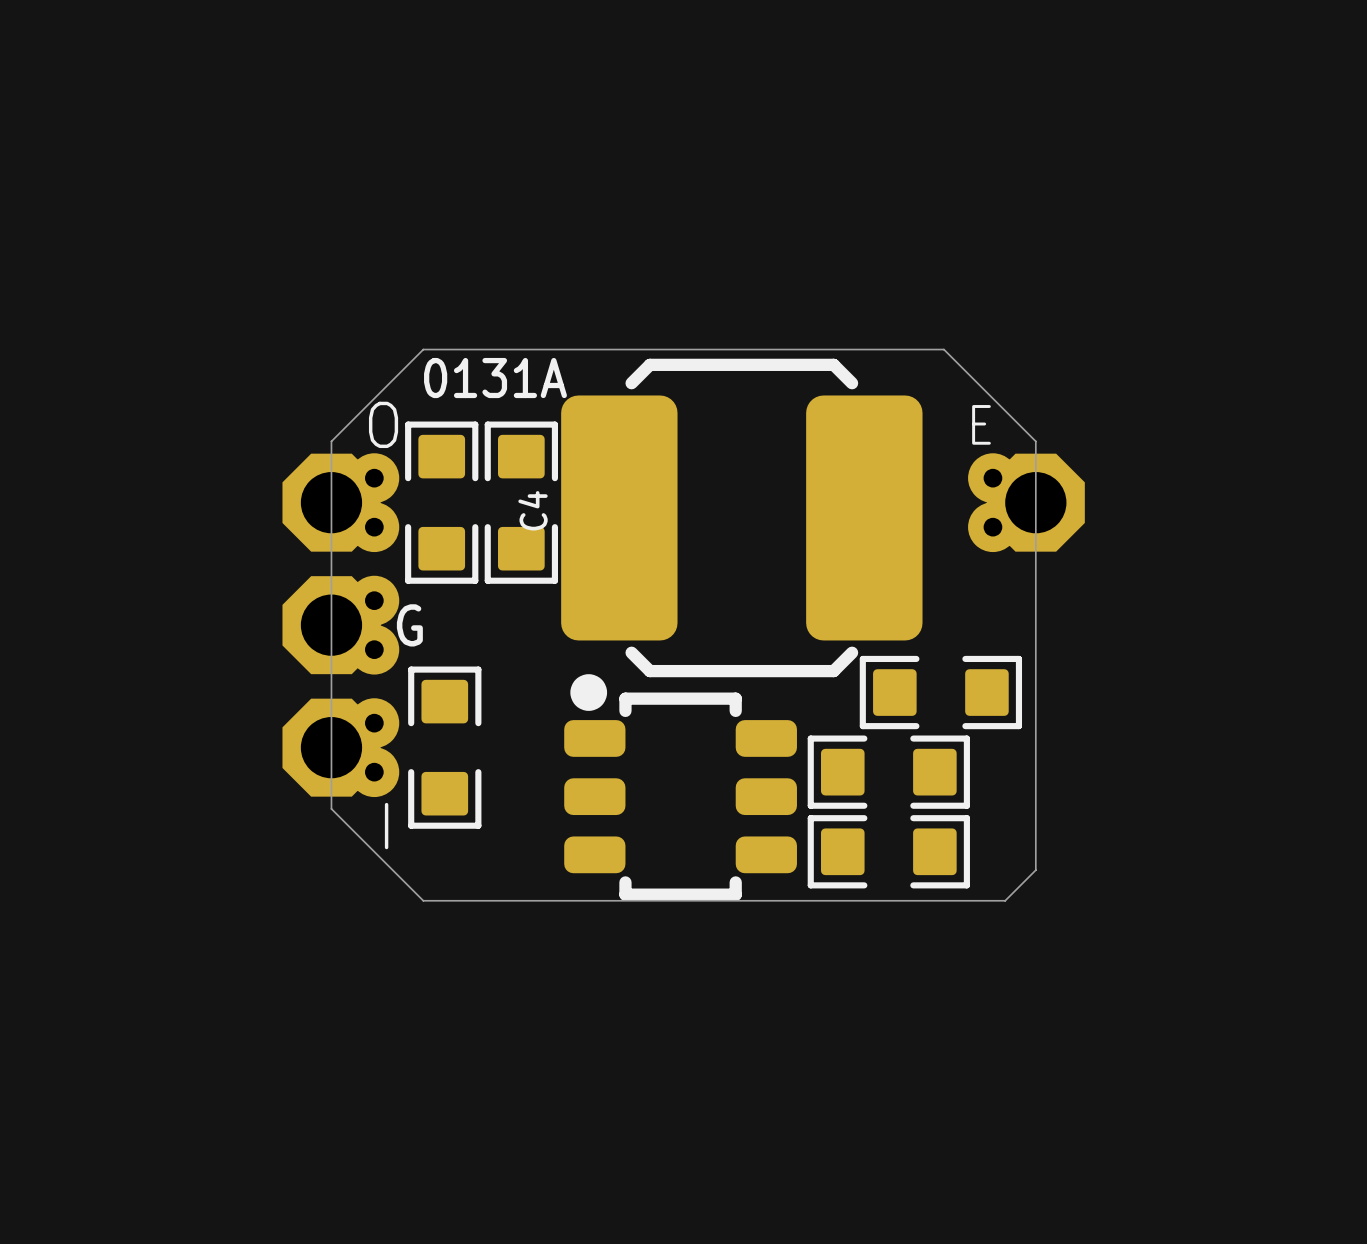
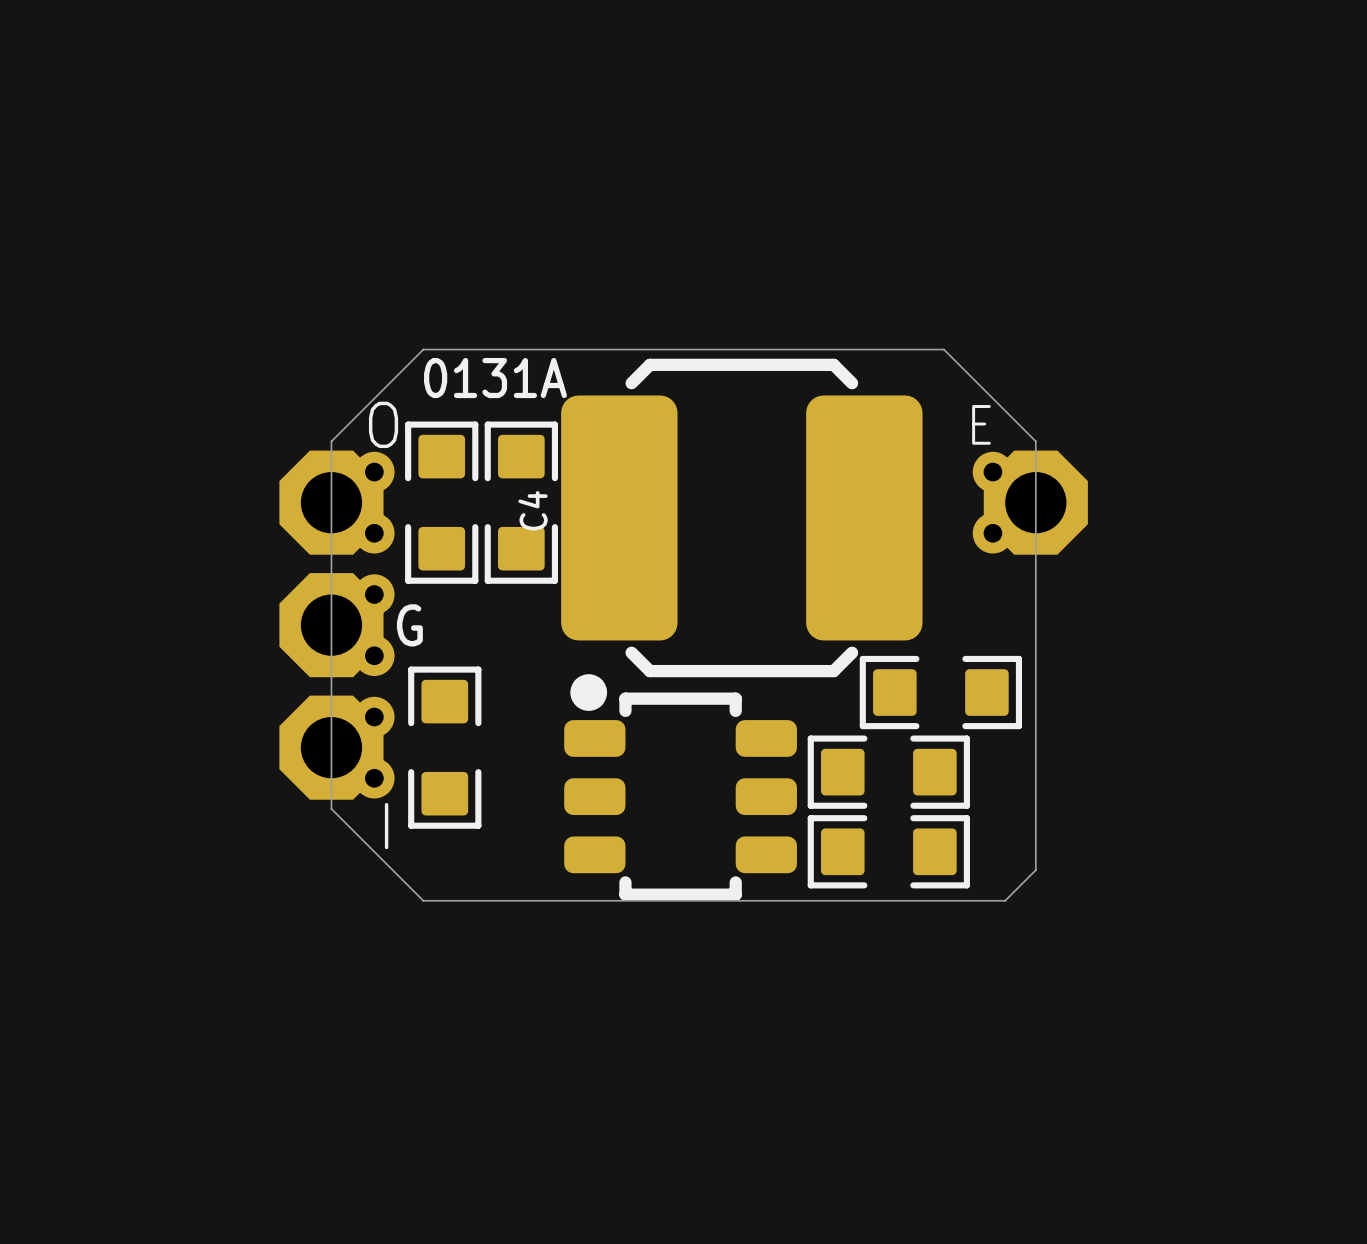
O footprint: [282, 453, 400, 553] -> [279, 450, 395, 555]
E footprint: [968, 453, 1085, 553] -> [972, 450, 1088, 555]
G footprint: [282, 575, 400, 675] -> [279, 573, 395, 678]
I footprint: [282, 698, 400, 798] -> [279, 695, 395, 800]

